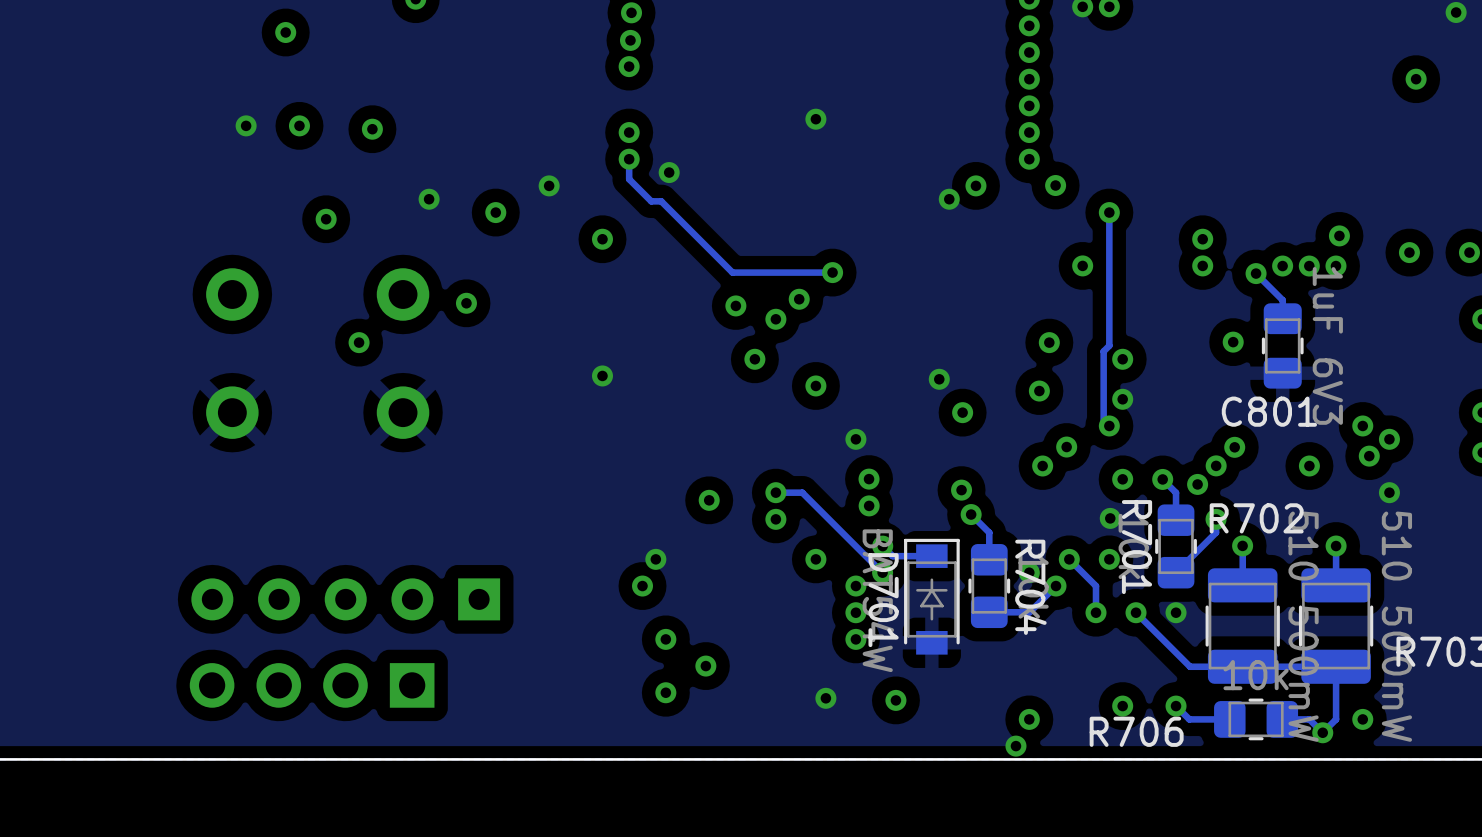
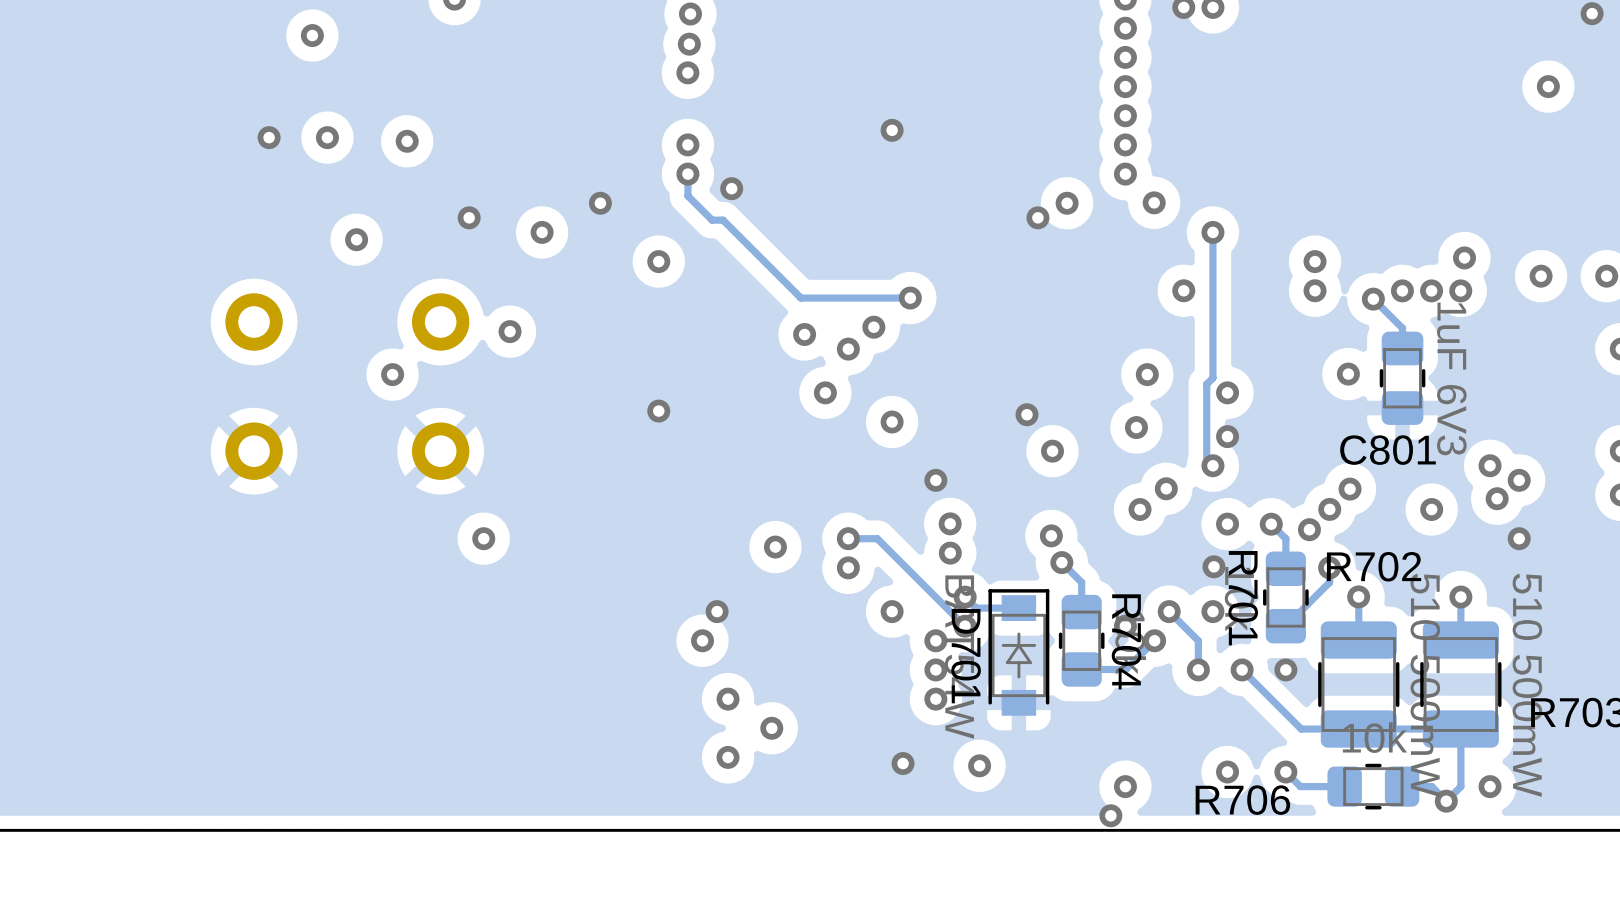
via: none -> (483, 538)
part: (345, 599) -> none
part: (312, 685) -> none

